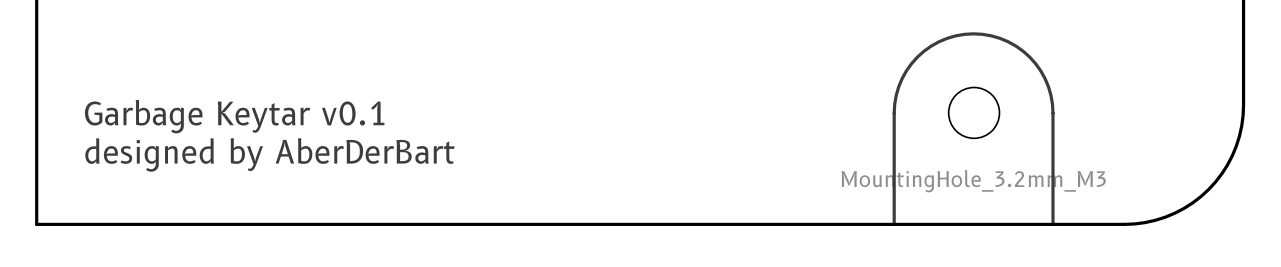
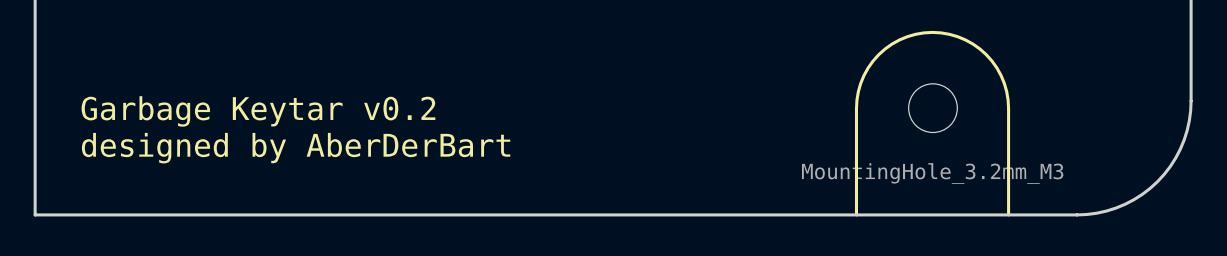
text: Garbage Keytar v0.1 (234, 116) -> Garbage Keytar v0.2 (258, 111)

